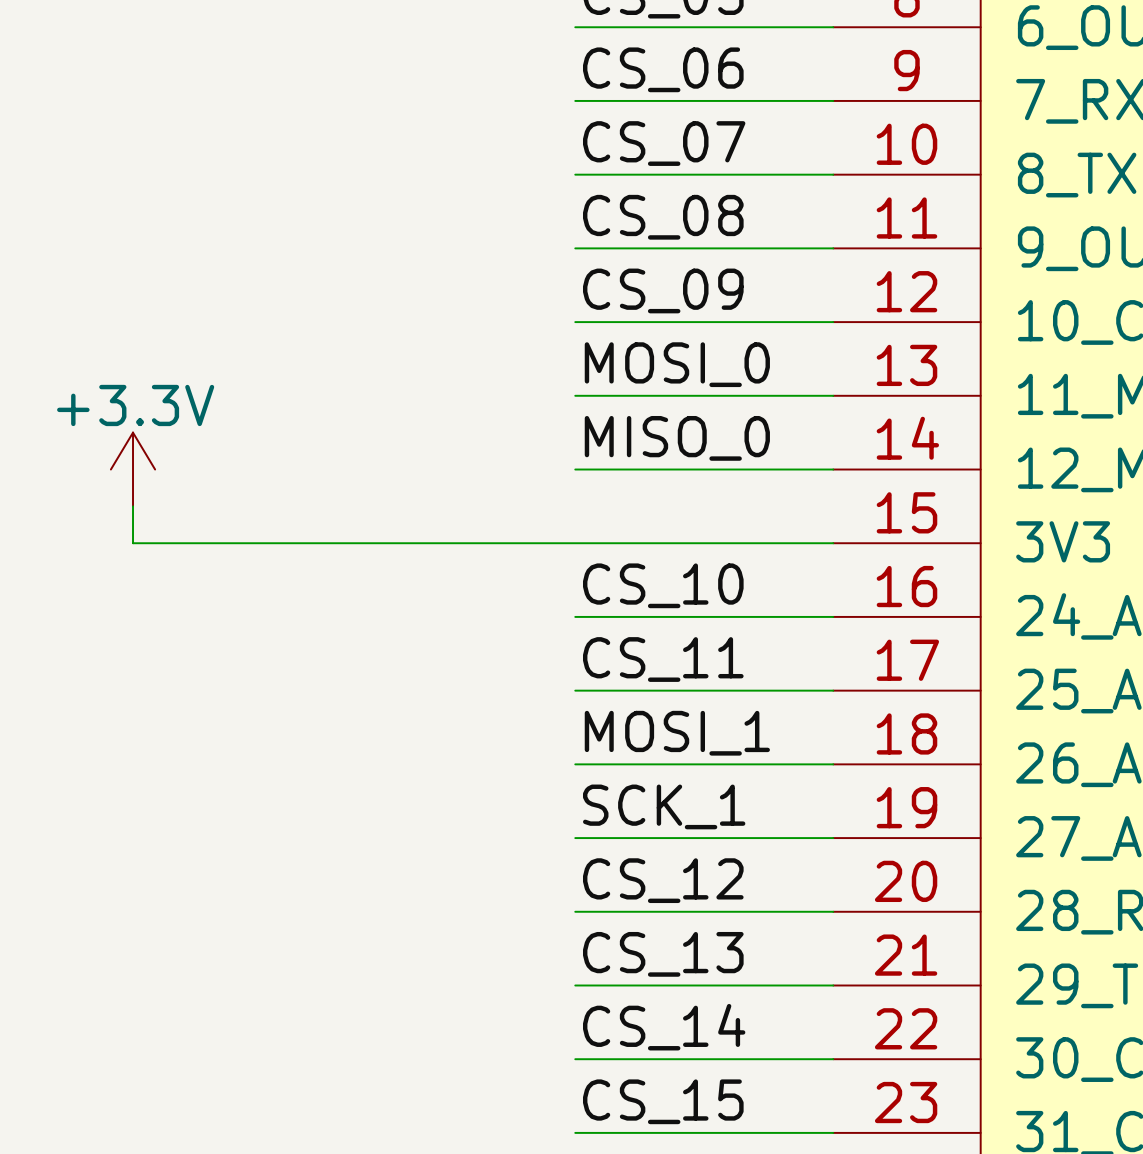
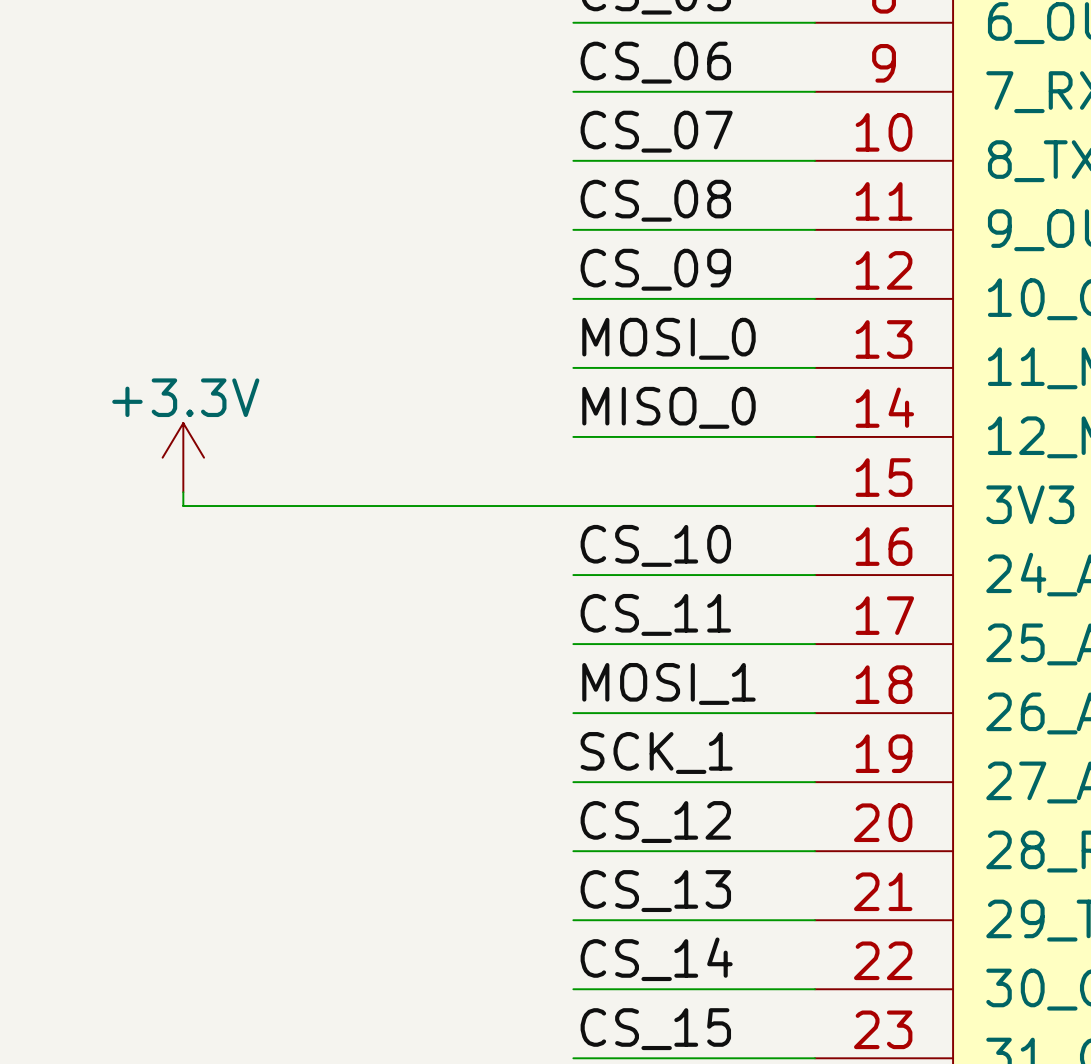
power symbol position: +3.3V (133, 469) -> +3.3V (183, 457)
wire: (133, 506) (133, 543) (158, 543) -> (183, 492) (183, 506)

